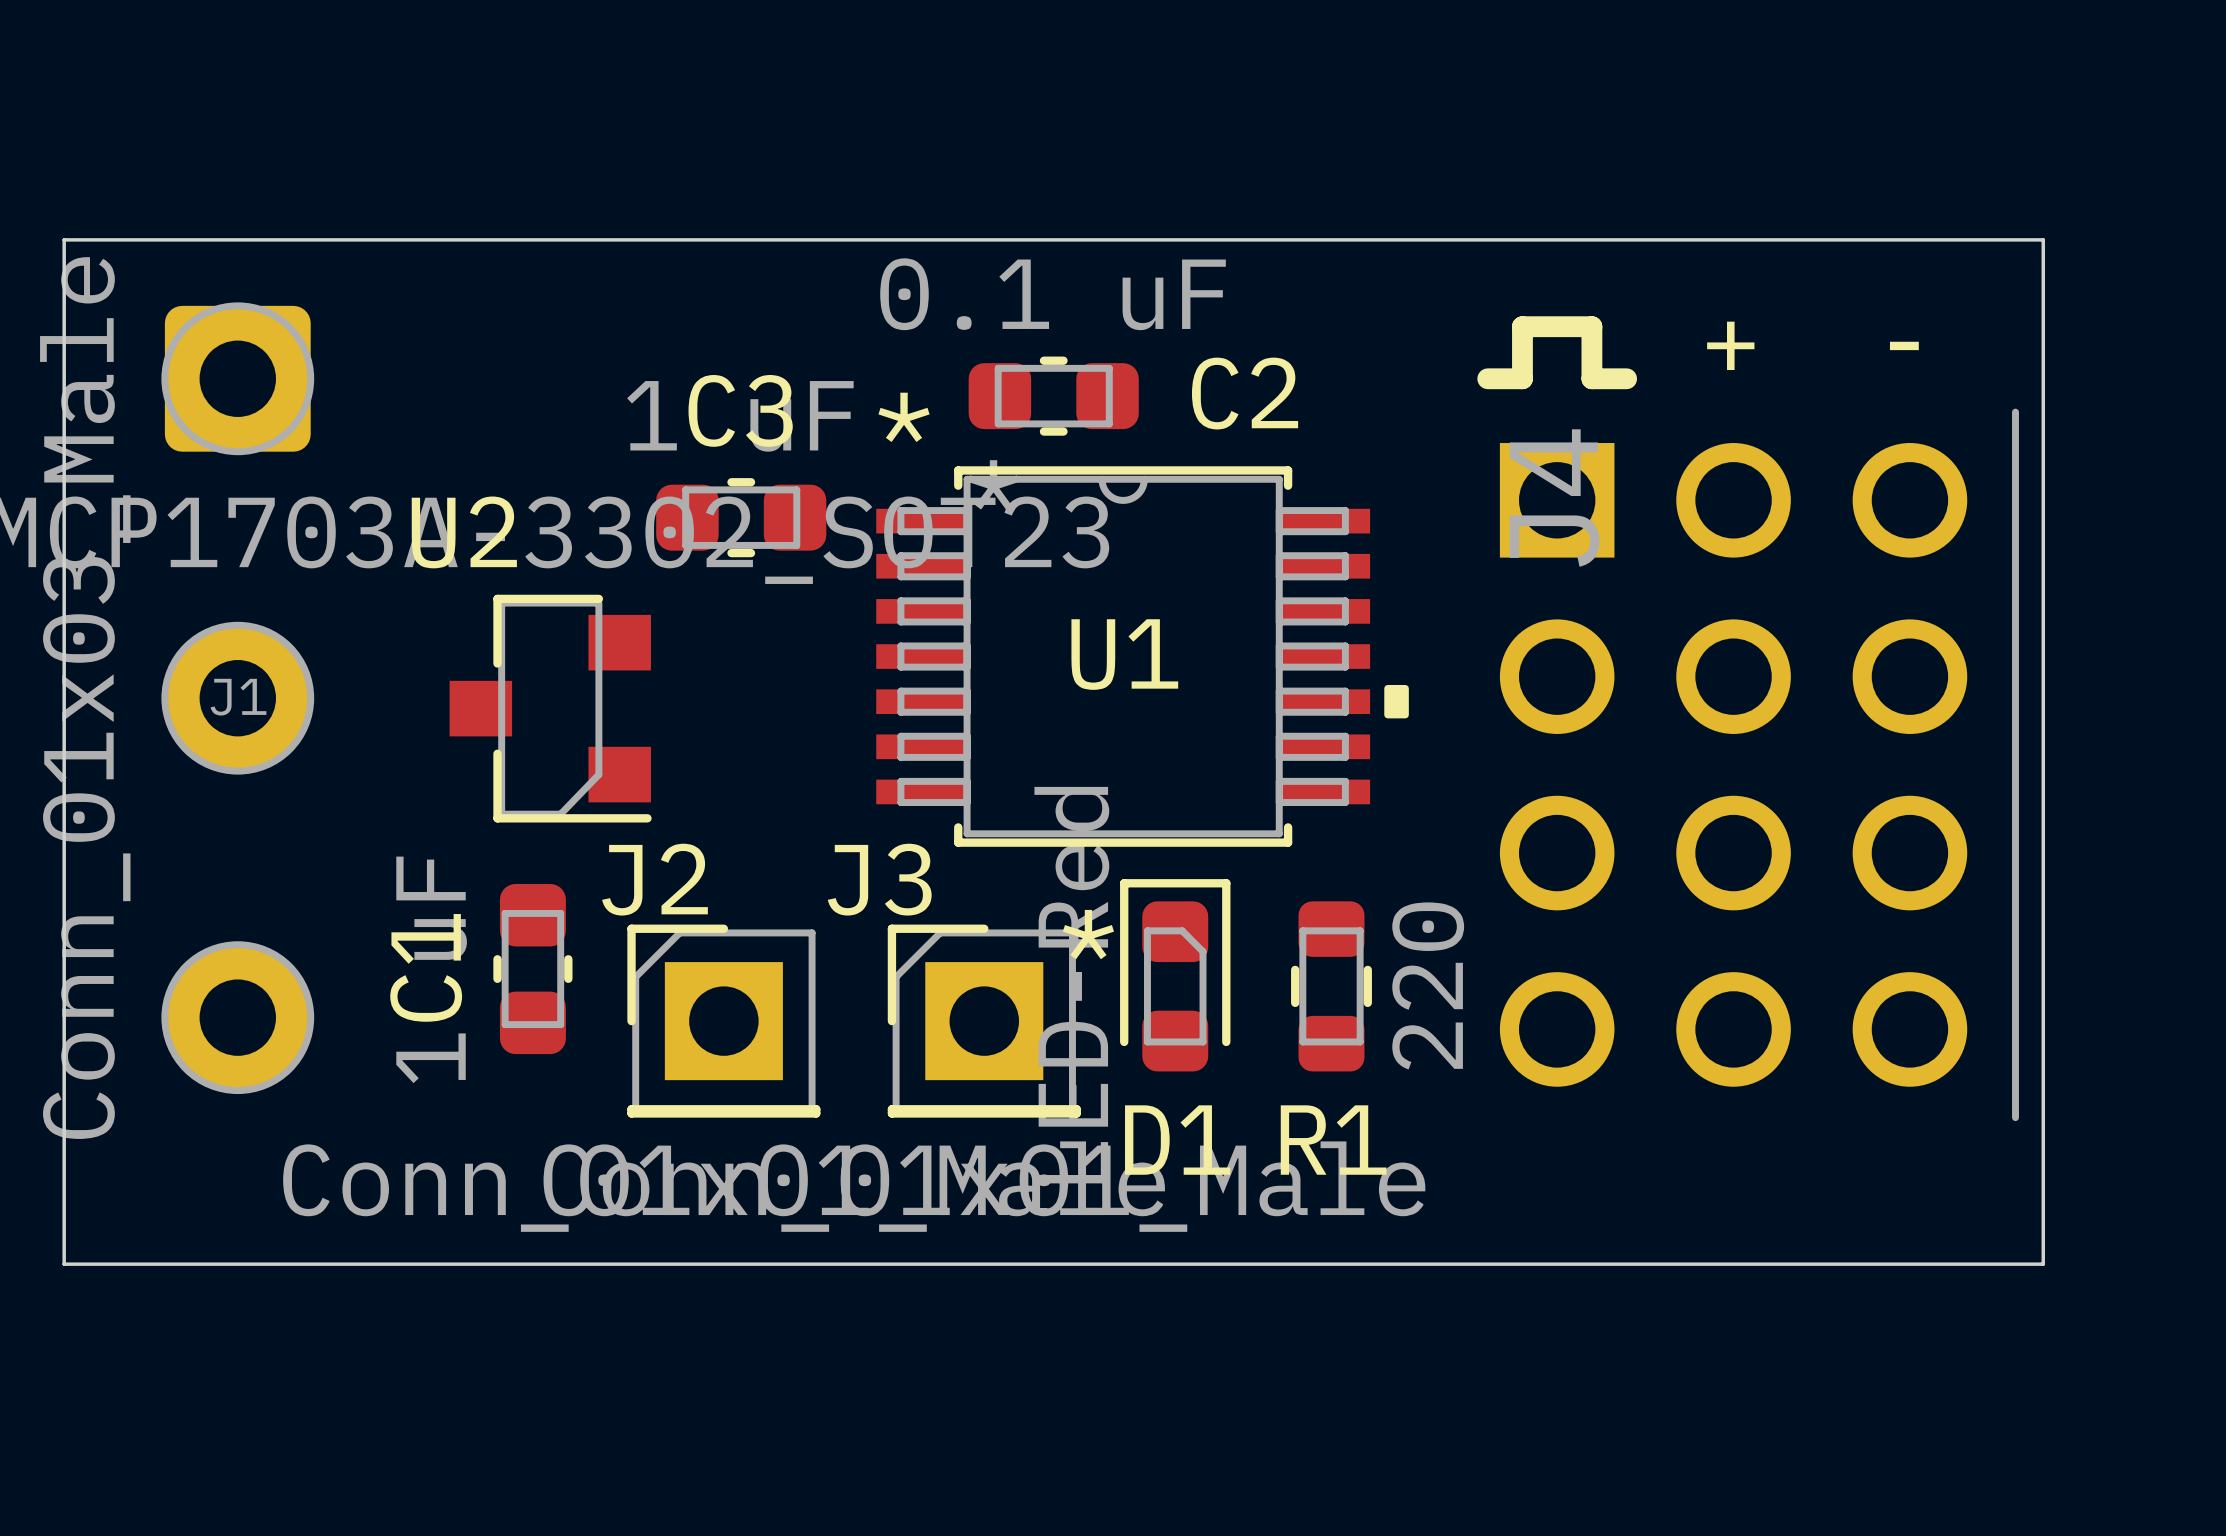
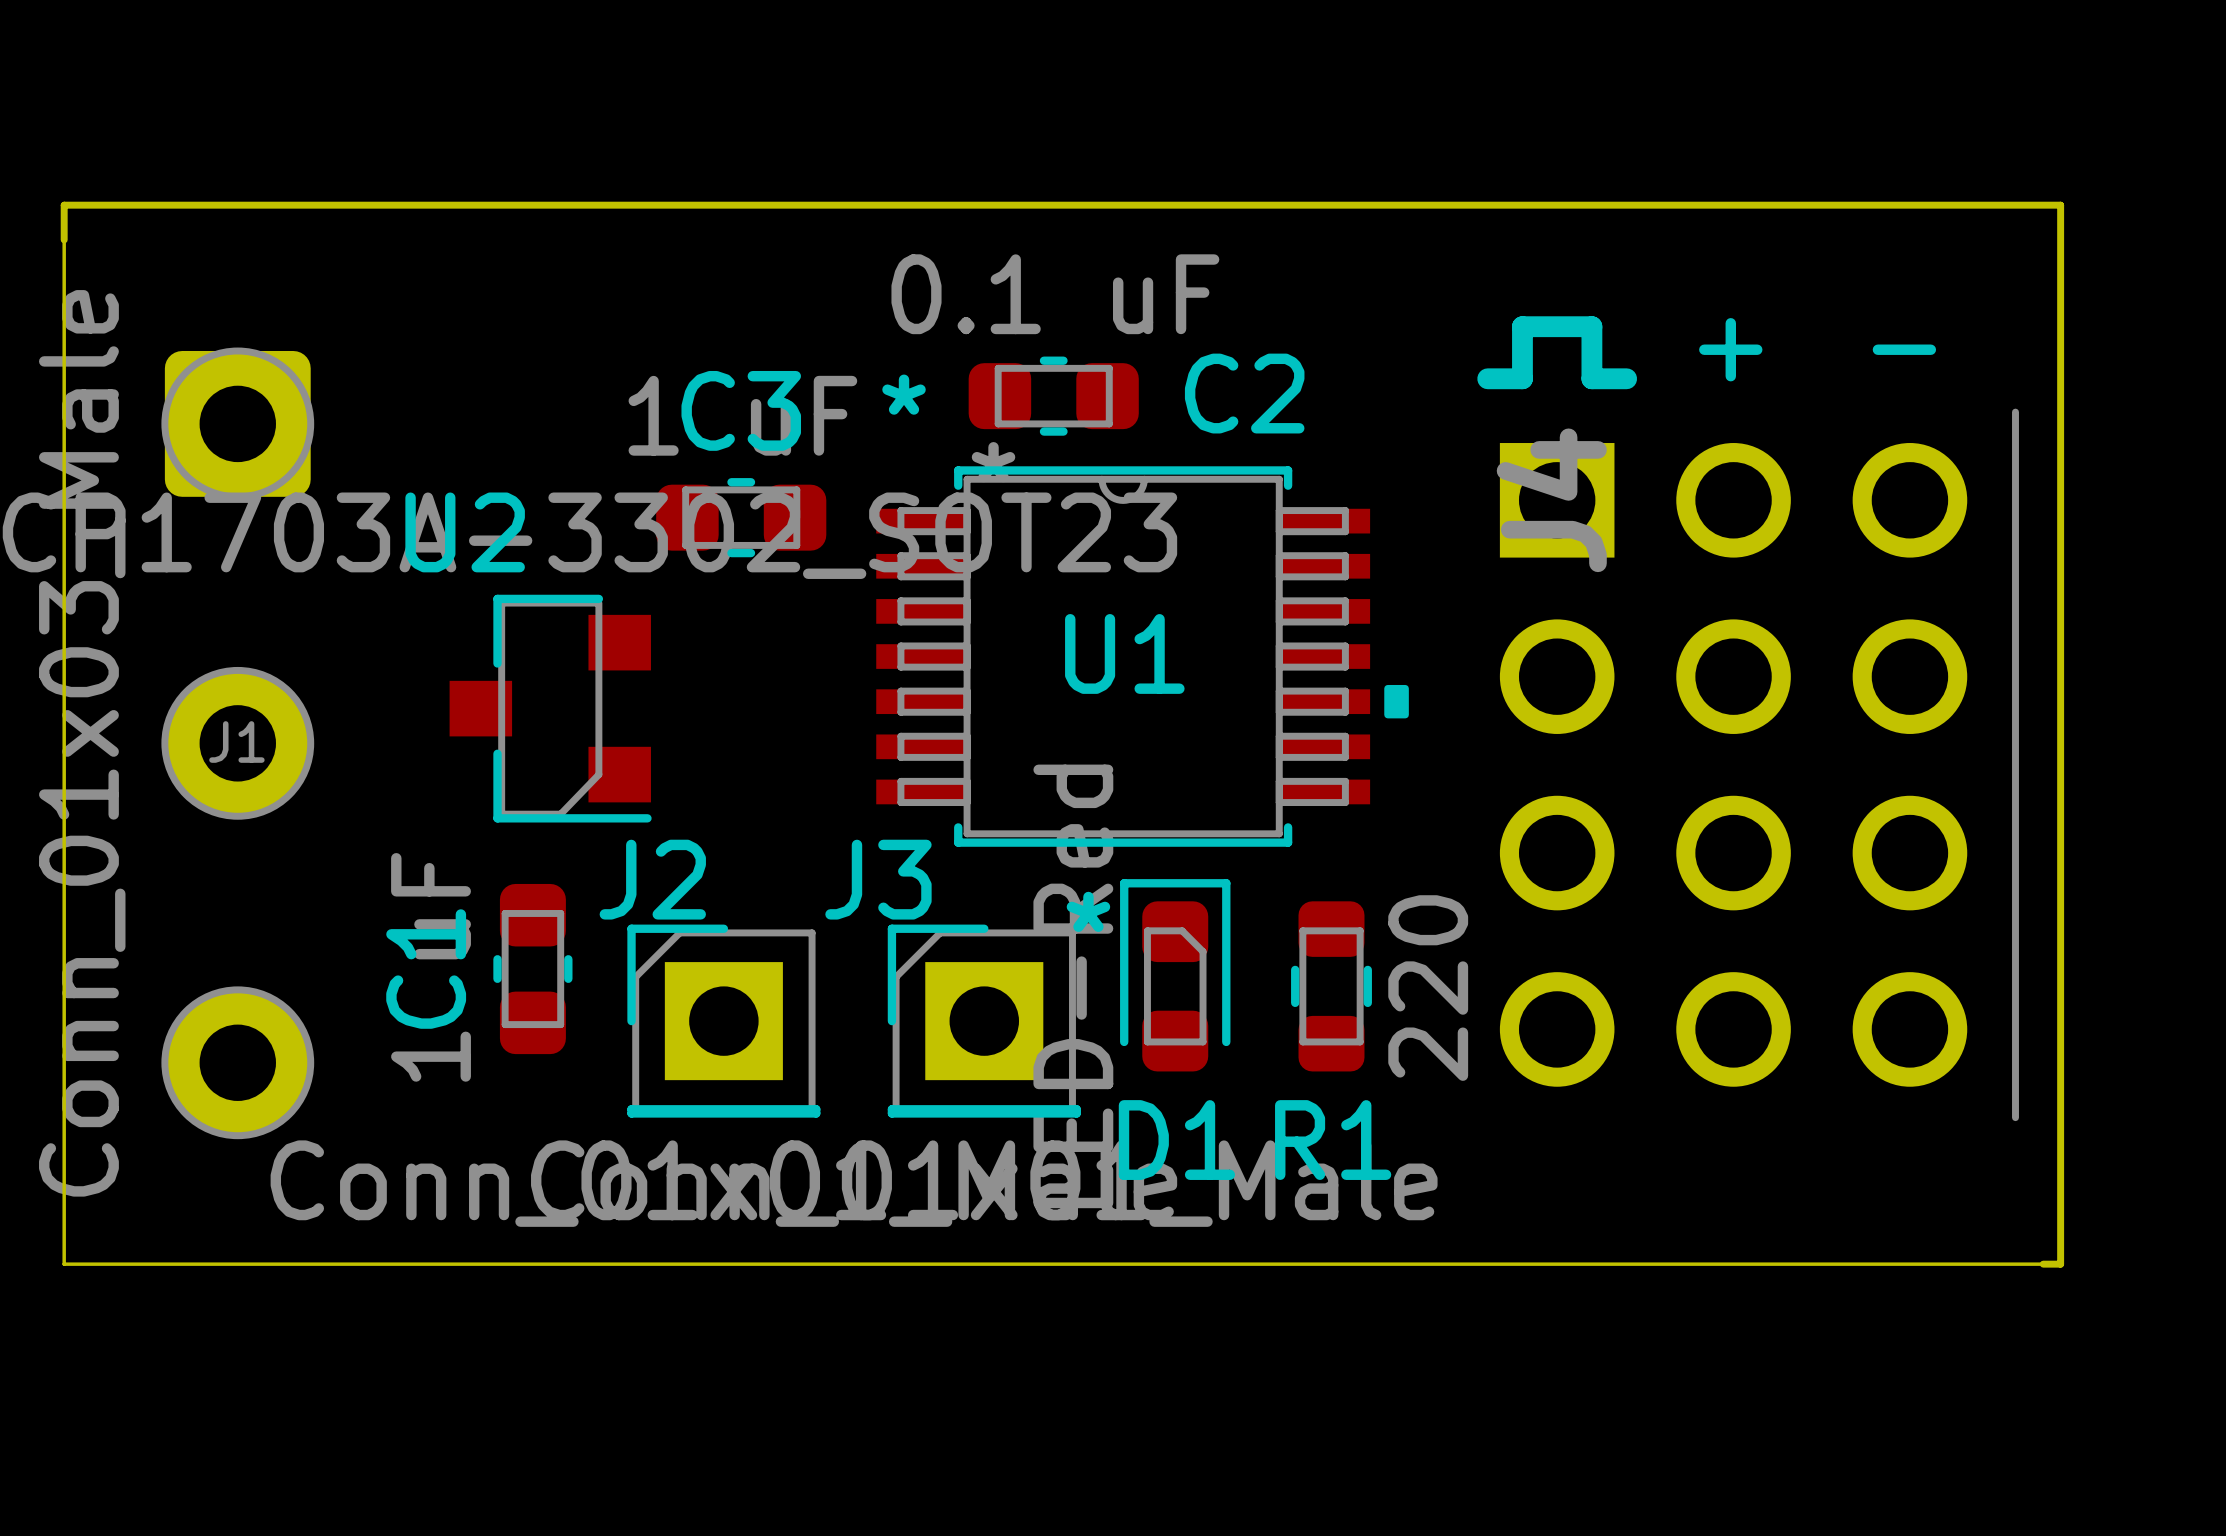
board edge: (64, 239) (2043, 239) (2043, 1264) -> (64, 239) (64, 205) (2060, 205) (2060, 1264) (2043, 1264)
J1 position: (237, 698) -> (237, 743)

